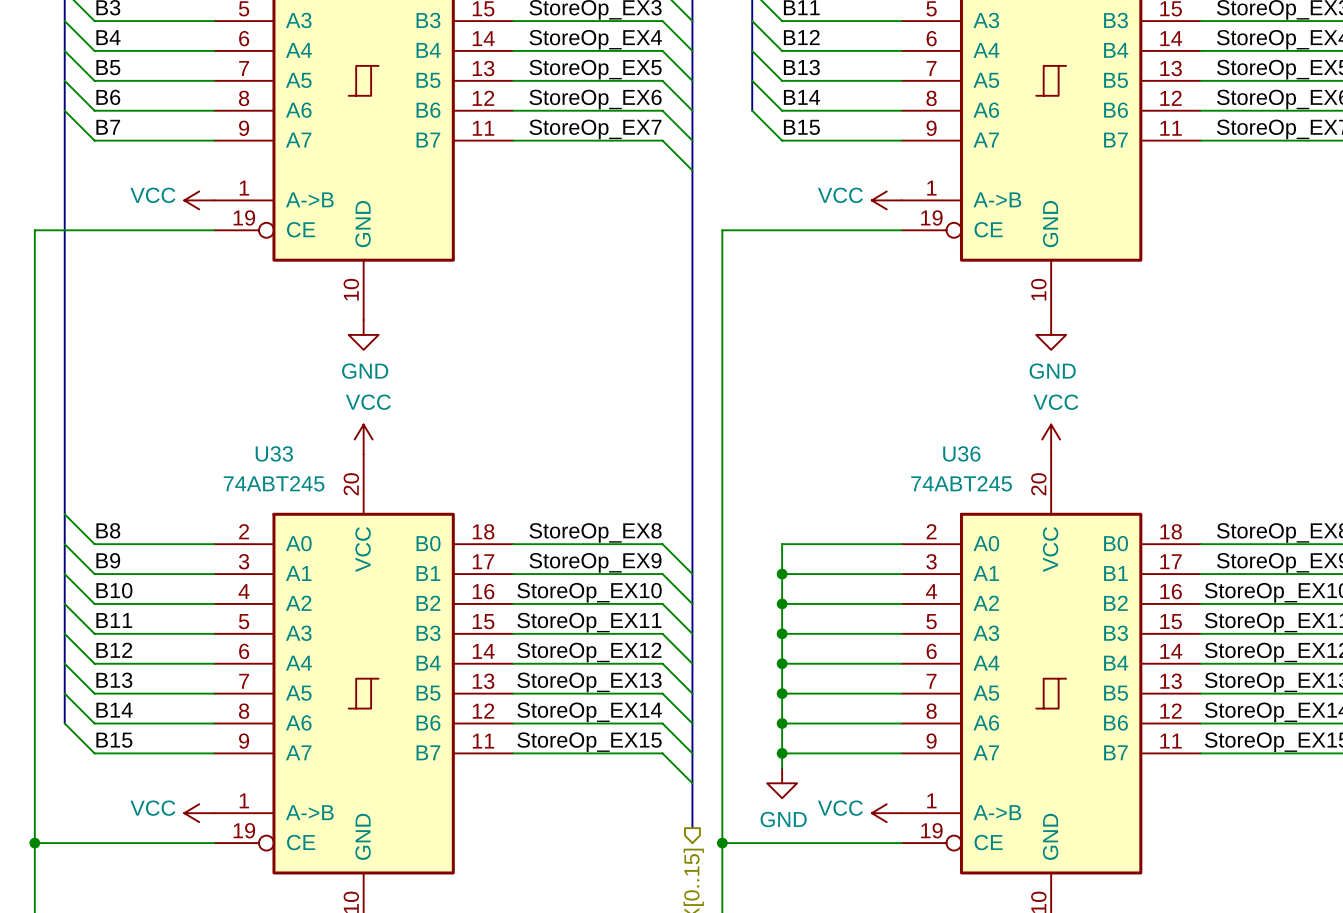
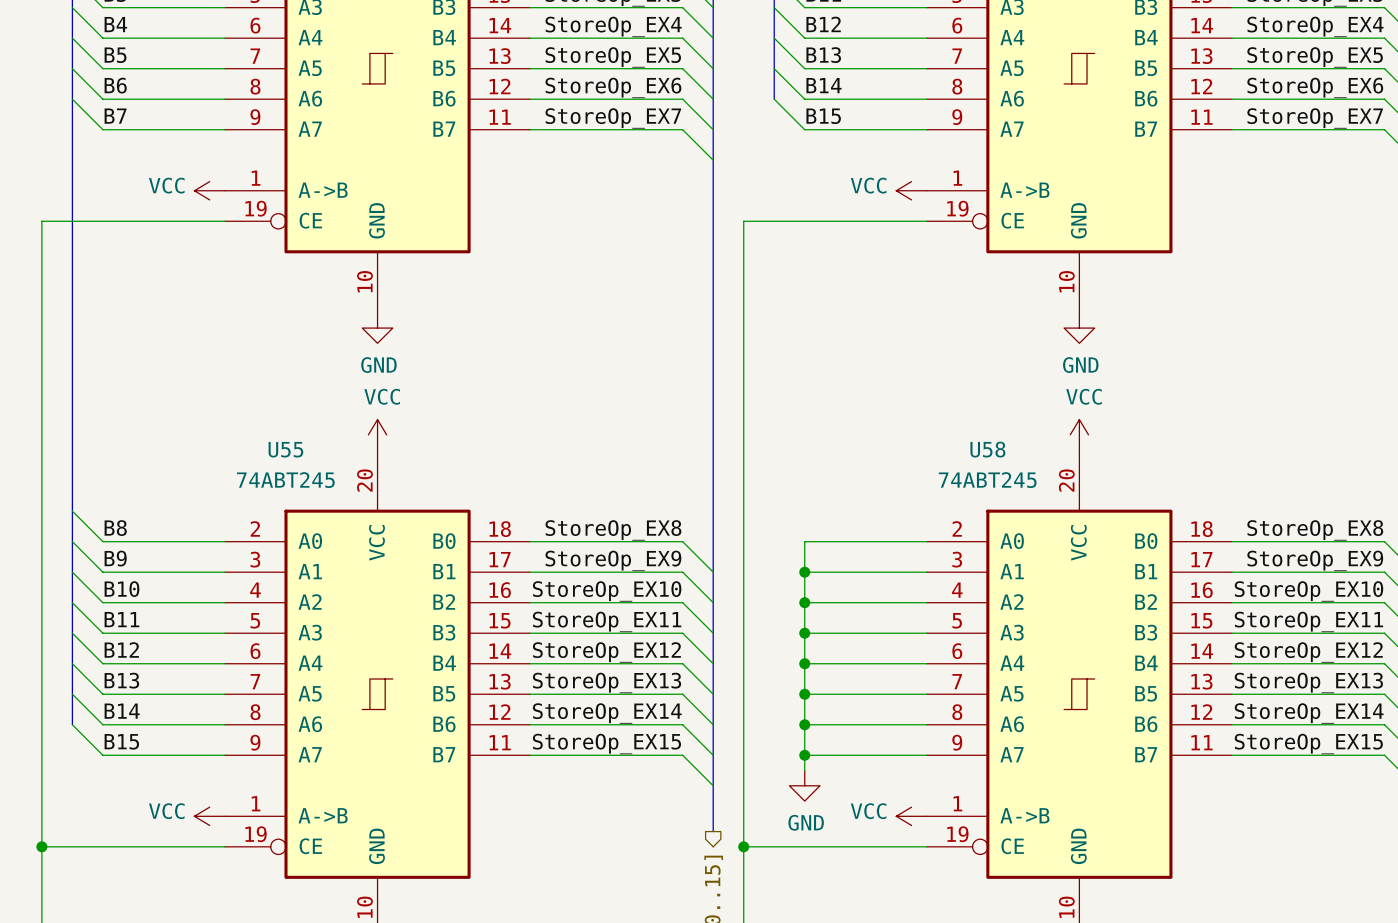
U33 name: U33 (274, 453) -> U55 (285, 449)
U36 name: U36 (961, 453) -> U58 (987, 449)

